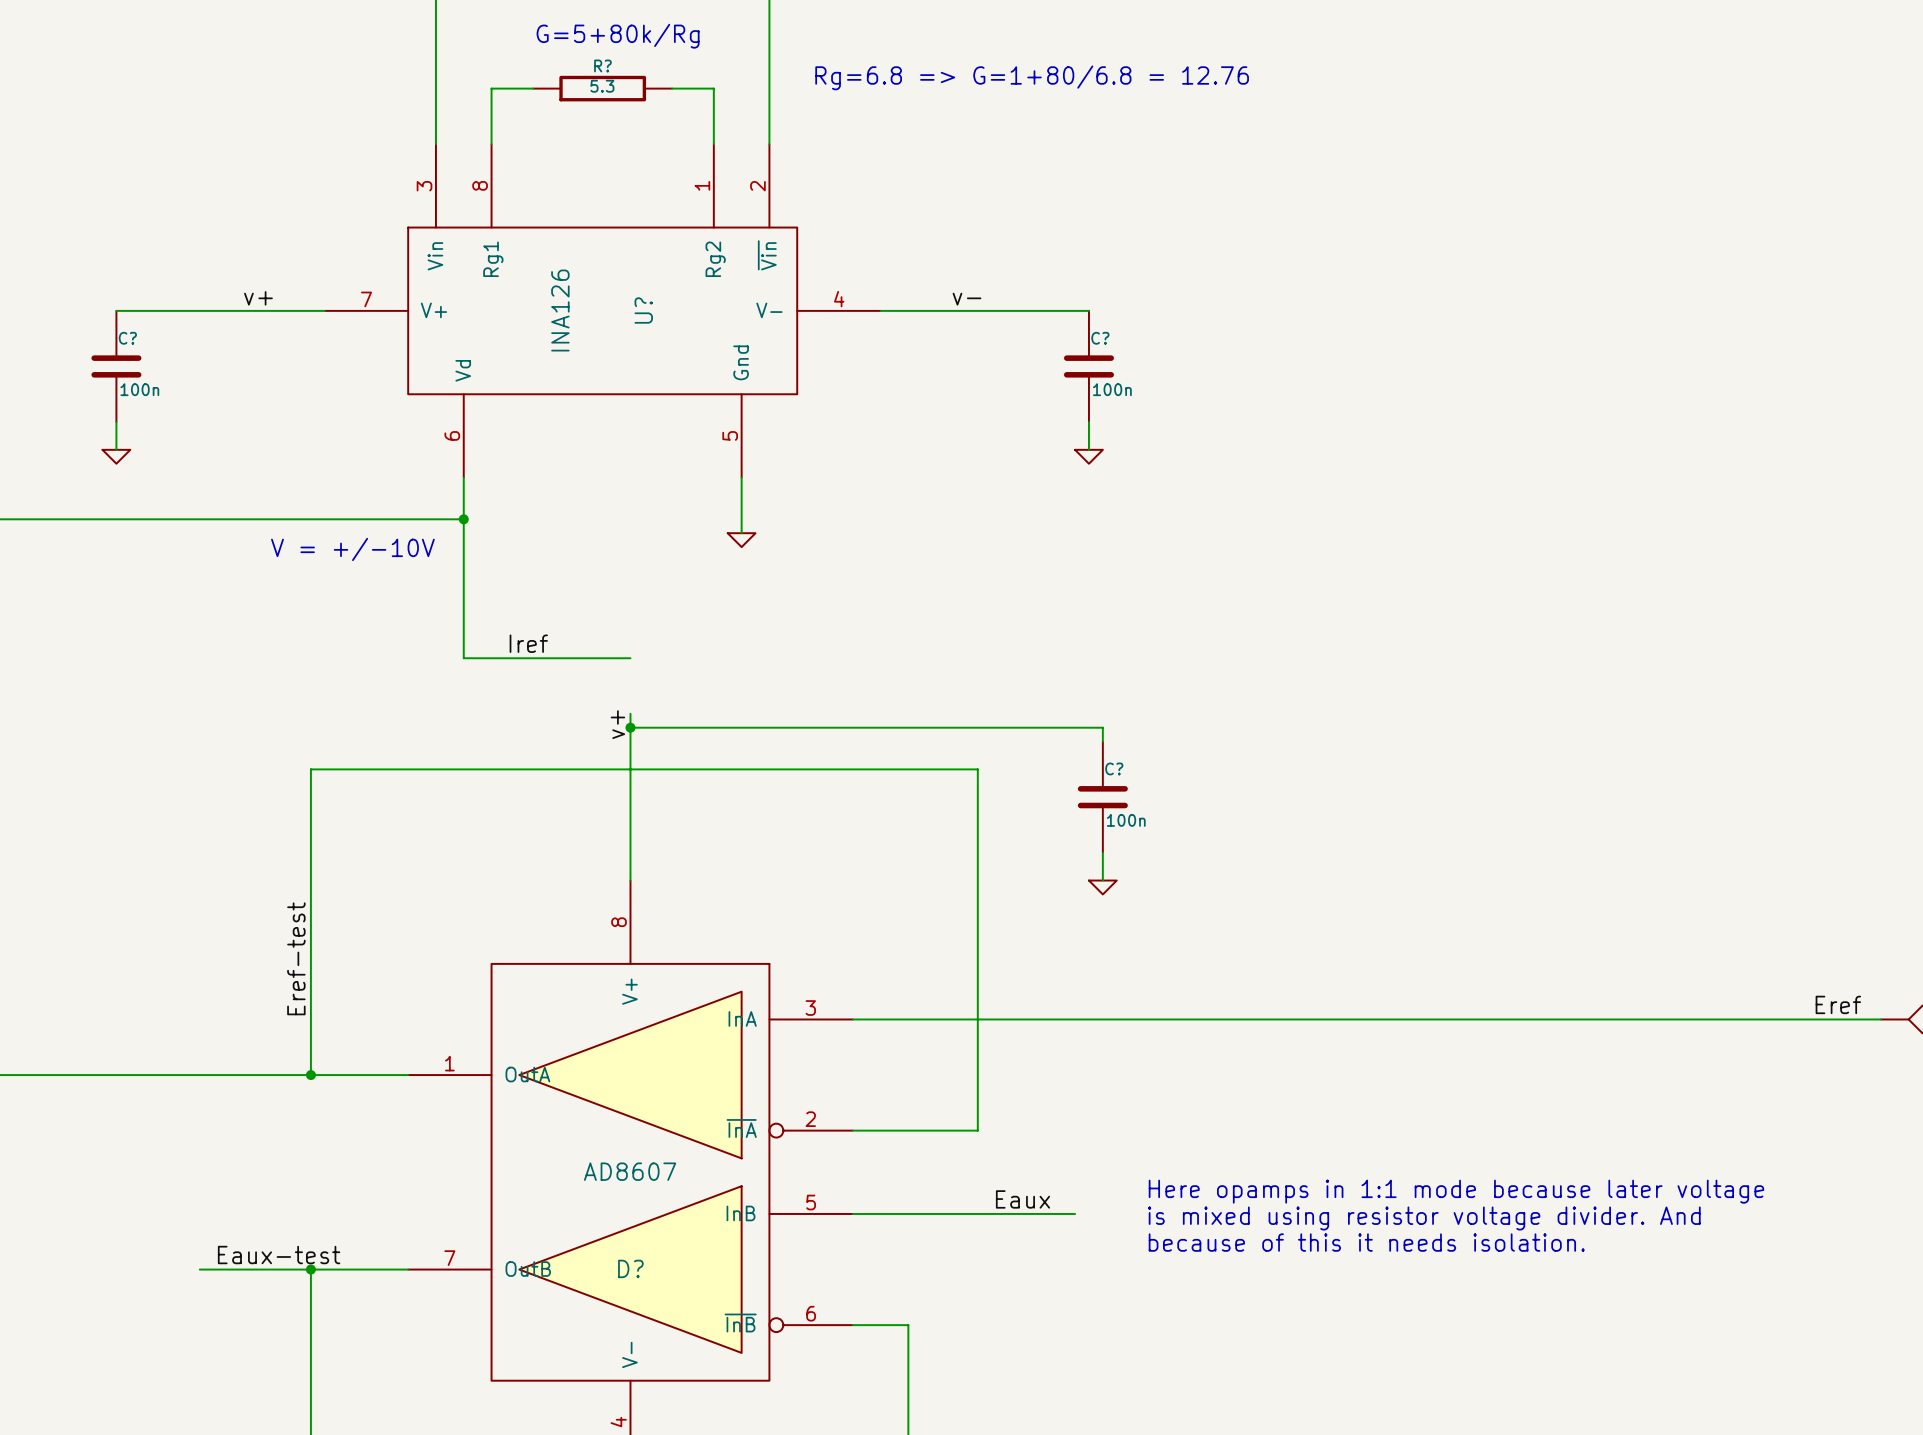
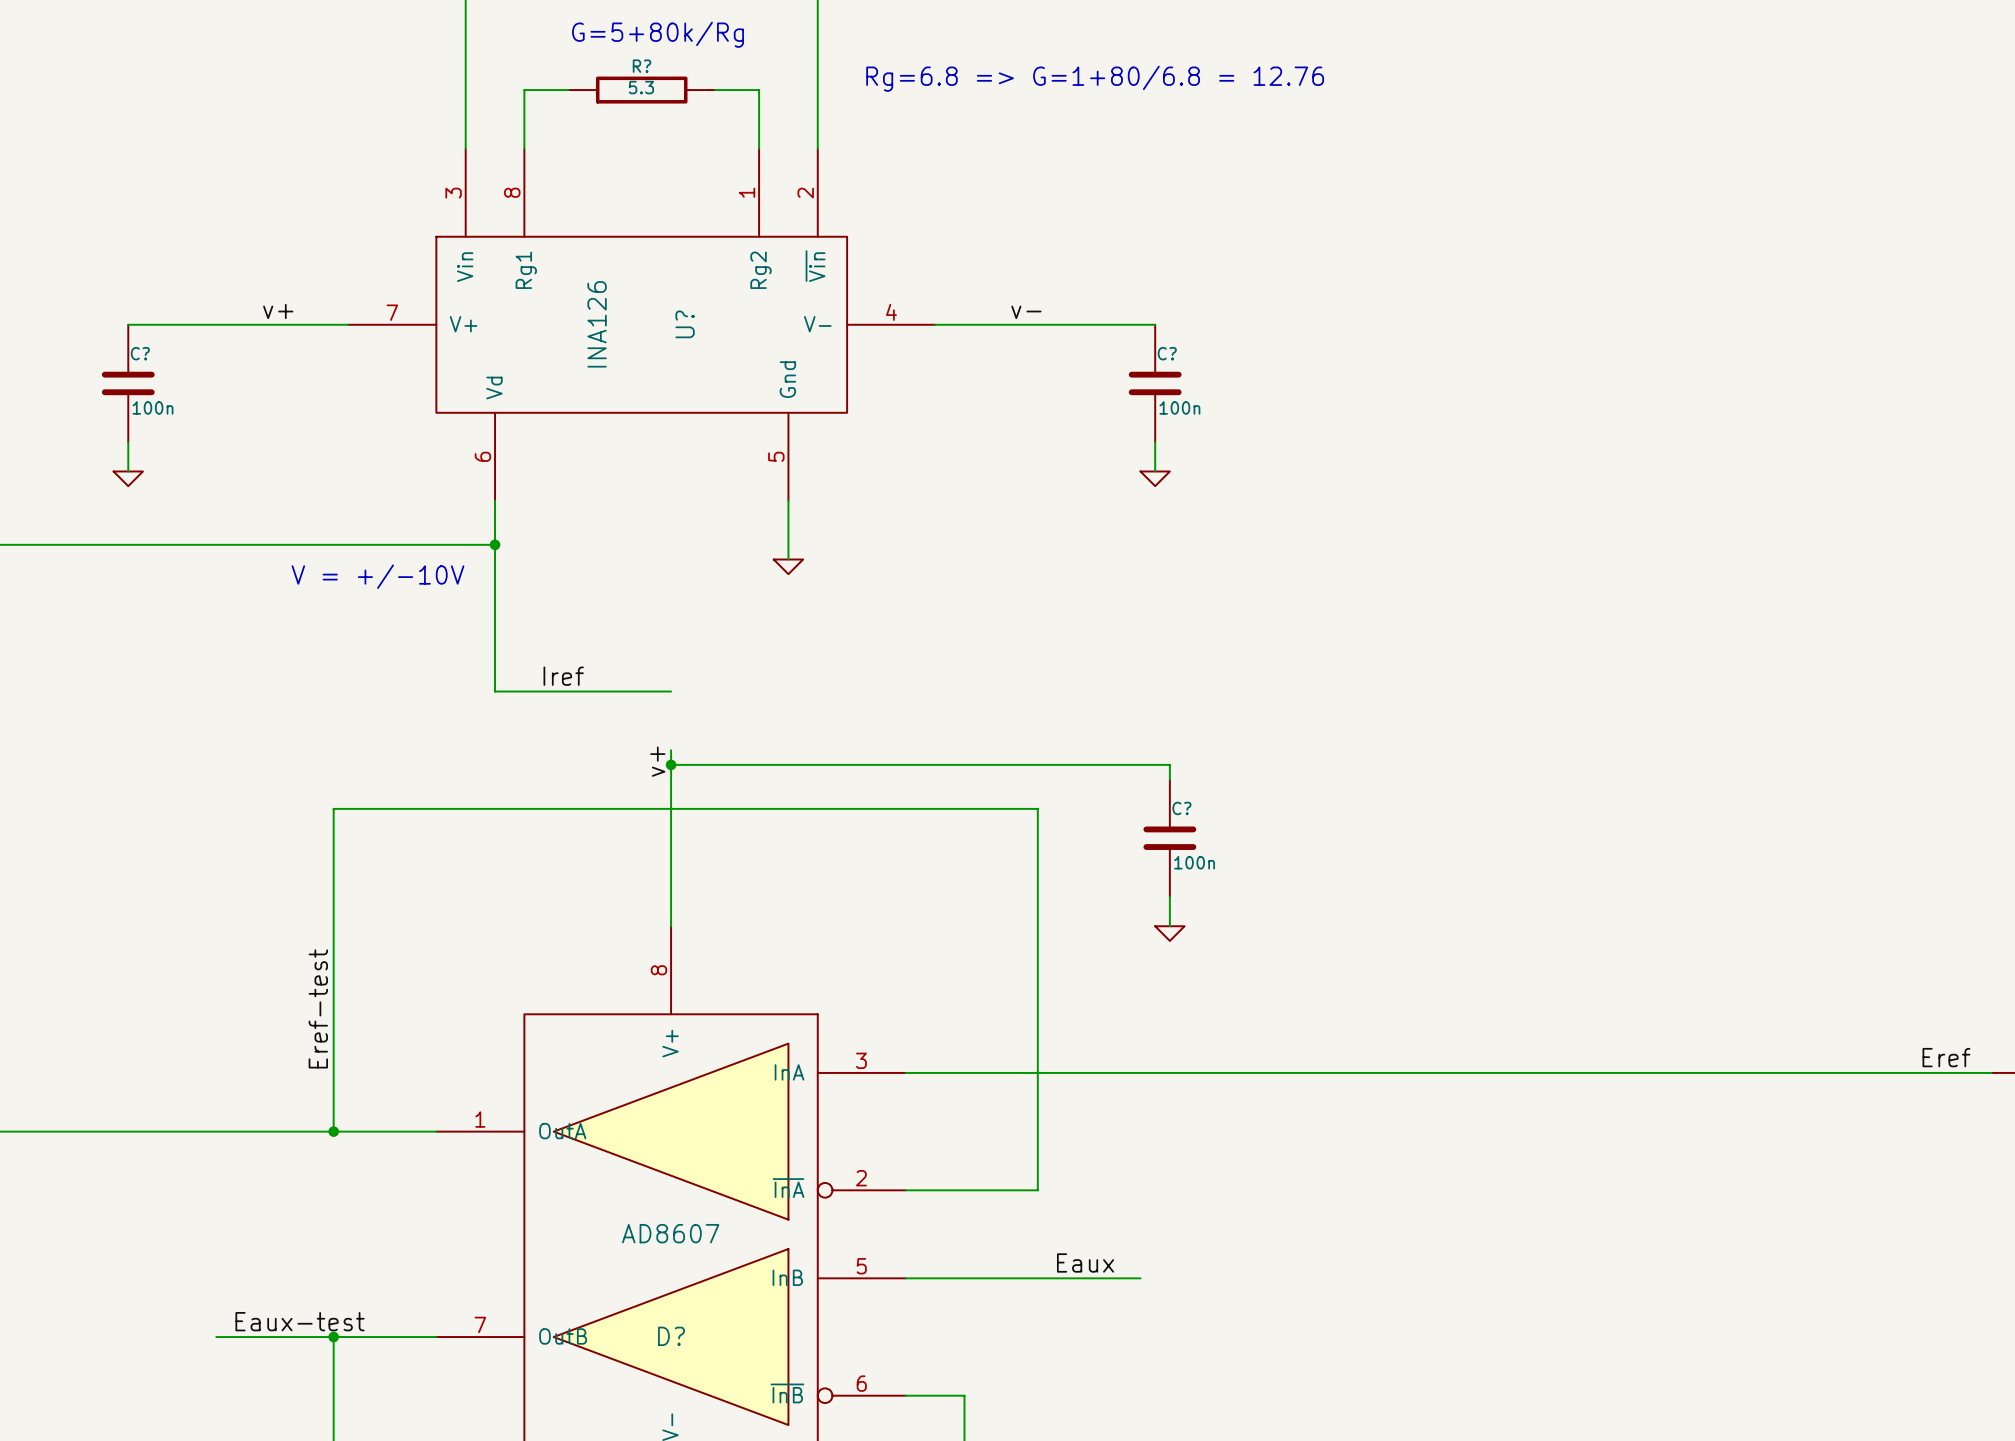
text: Here opamps in 1:1 mode because later voltage (1456, 1191) -> none
text: is mixed using resistor voltage divider. And (1424, 1218) -> none
text: because of this it needs isolation. (1366, 1242) -> none

